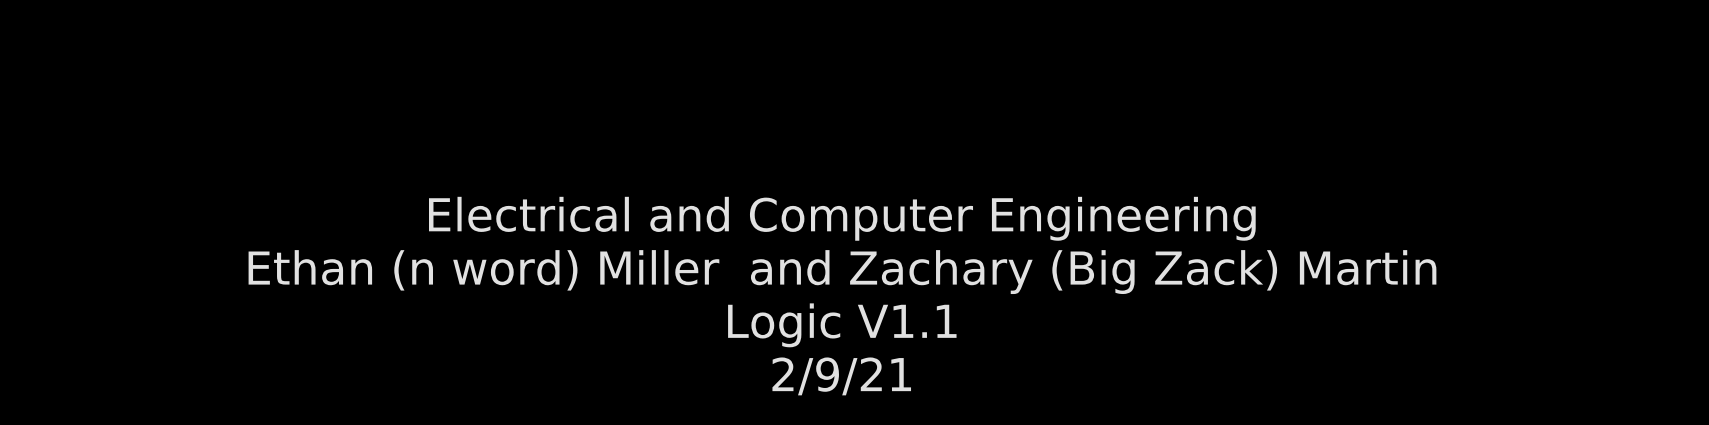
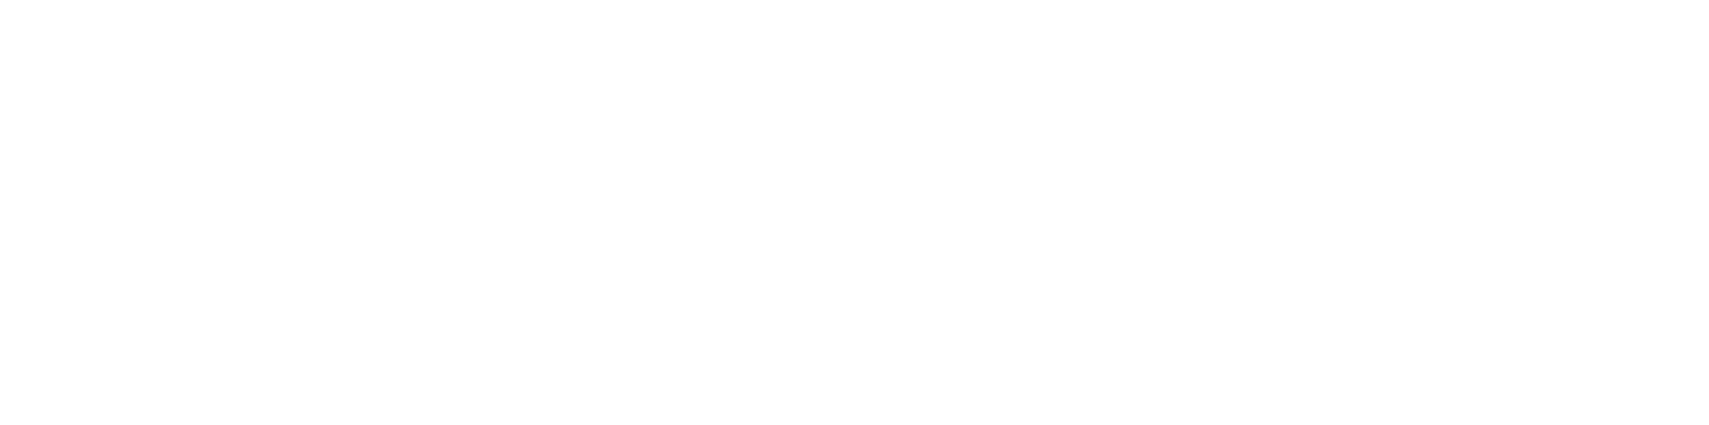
text: Electrical and Computer Engineering (842, 218) -> none
text: Ethan (n word) Miller and Zachary (Big Zack) Martin (842, 272) -> none
text: Logic V1.1 (842, 325) -> none
text: 2/9/21 (841, 376) -> none

